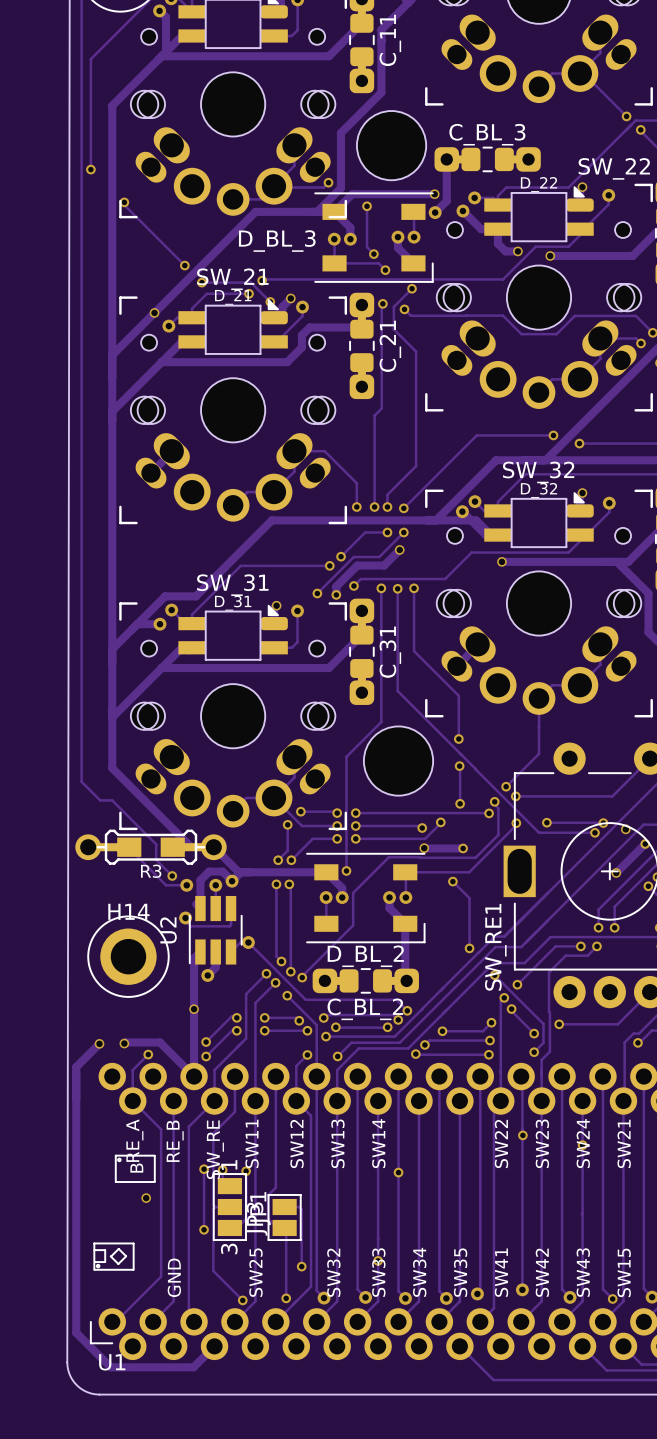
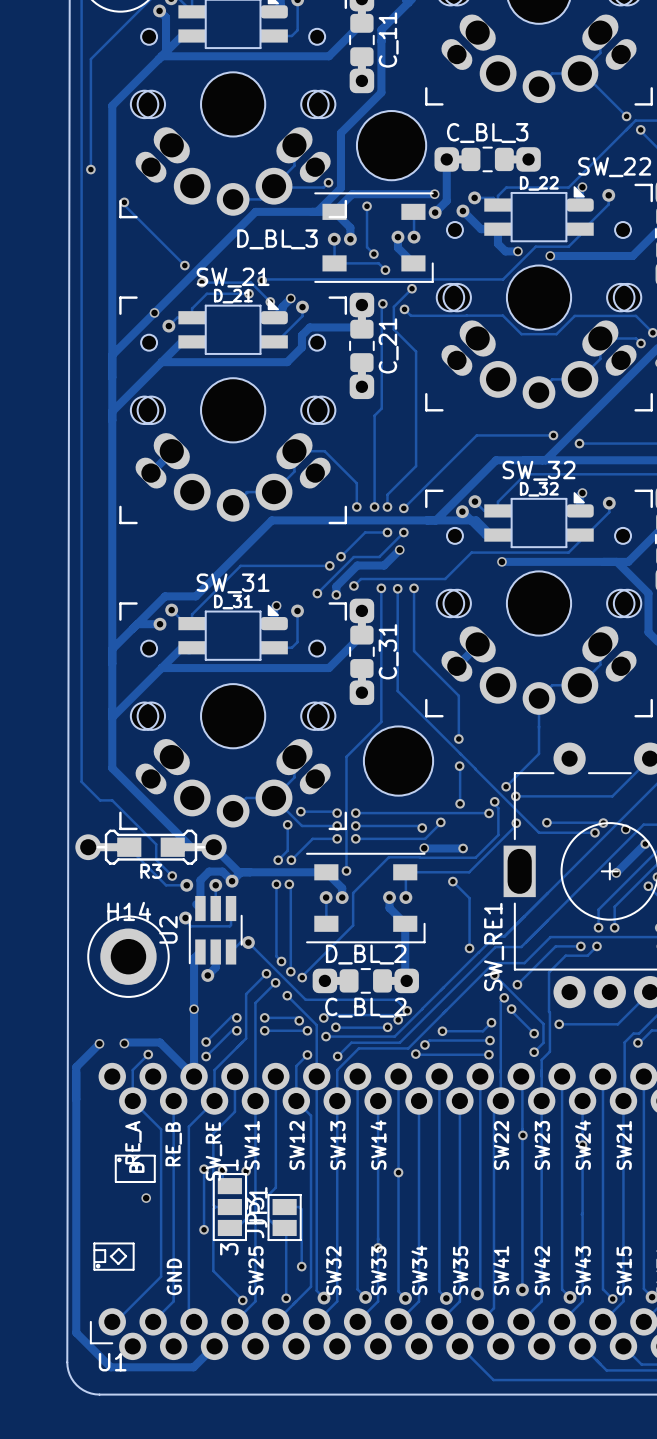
via position: (378, 1260) -> (378, 1247)

